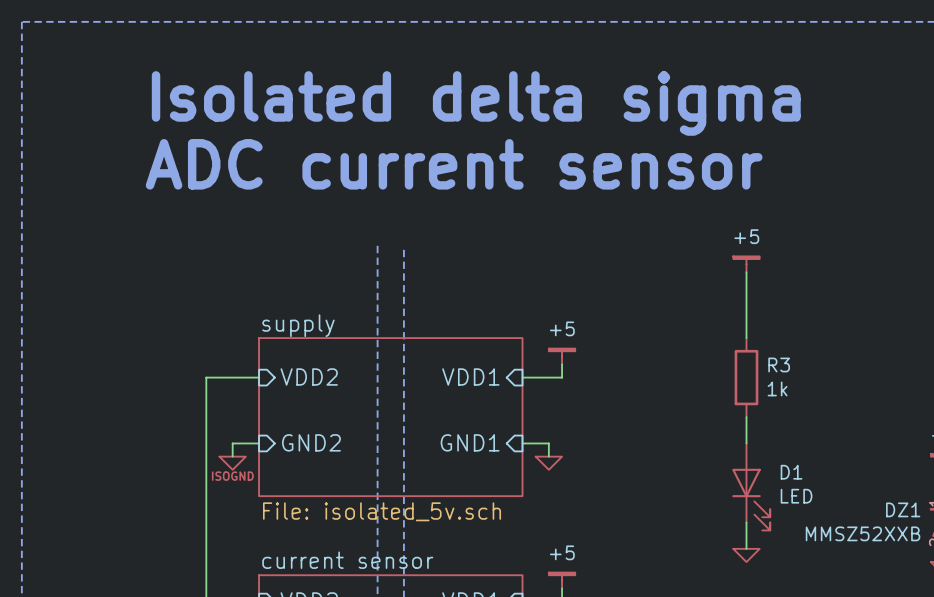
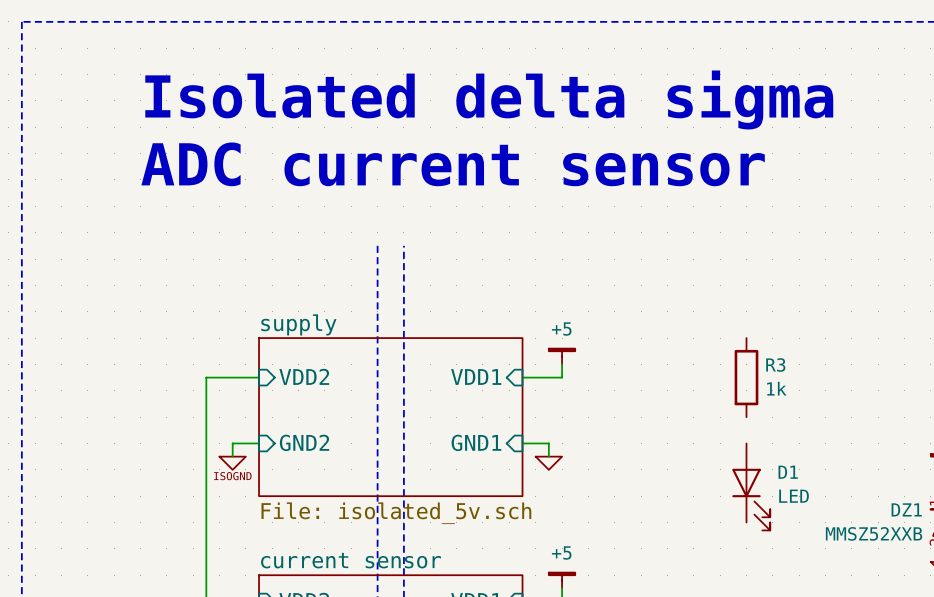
power symbol: +5 (746, 264) -> none
wire: (746, 272) (746, 338) -> none
wire: (746, 417) (746, 443) -> none
wire: (746, 522) (746, 548) -> none
power symbol: (746, 555) -> none

